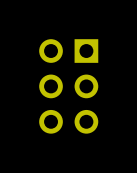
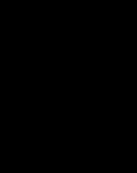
part: (68, 86) -> none

